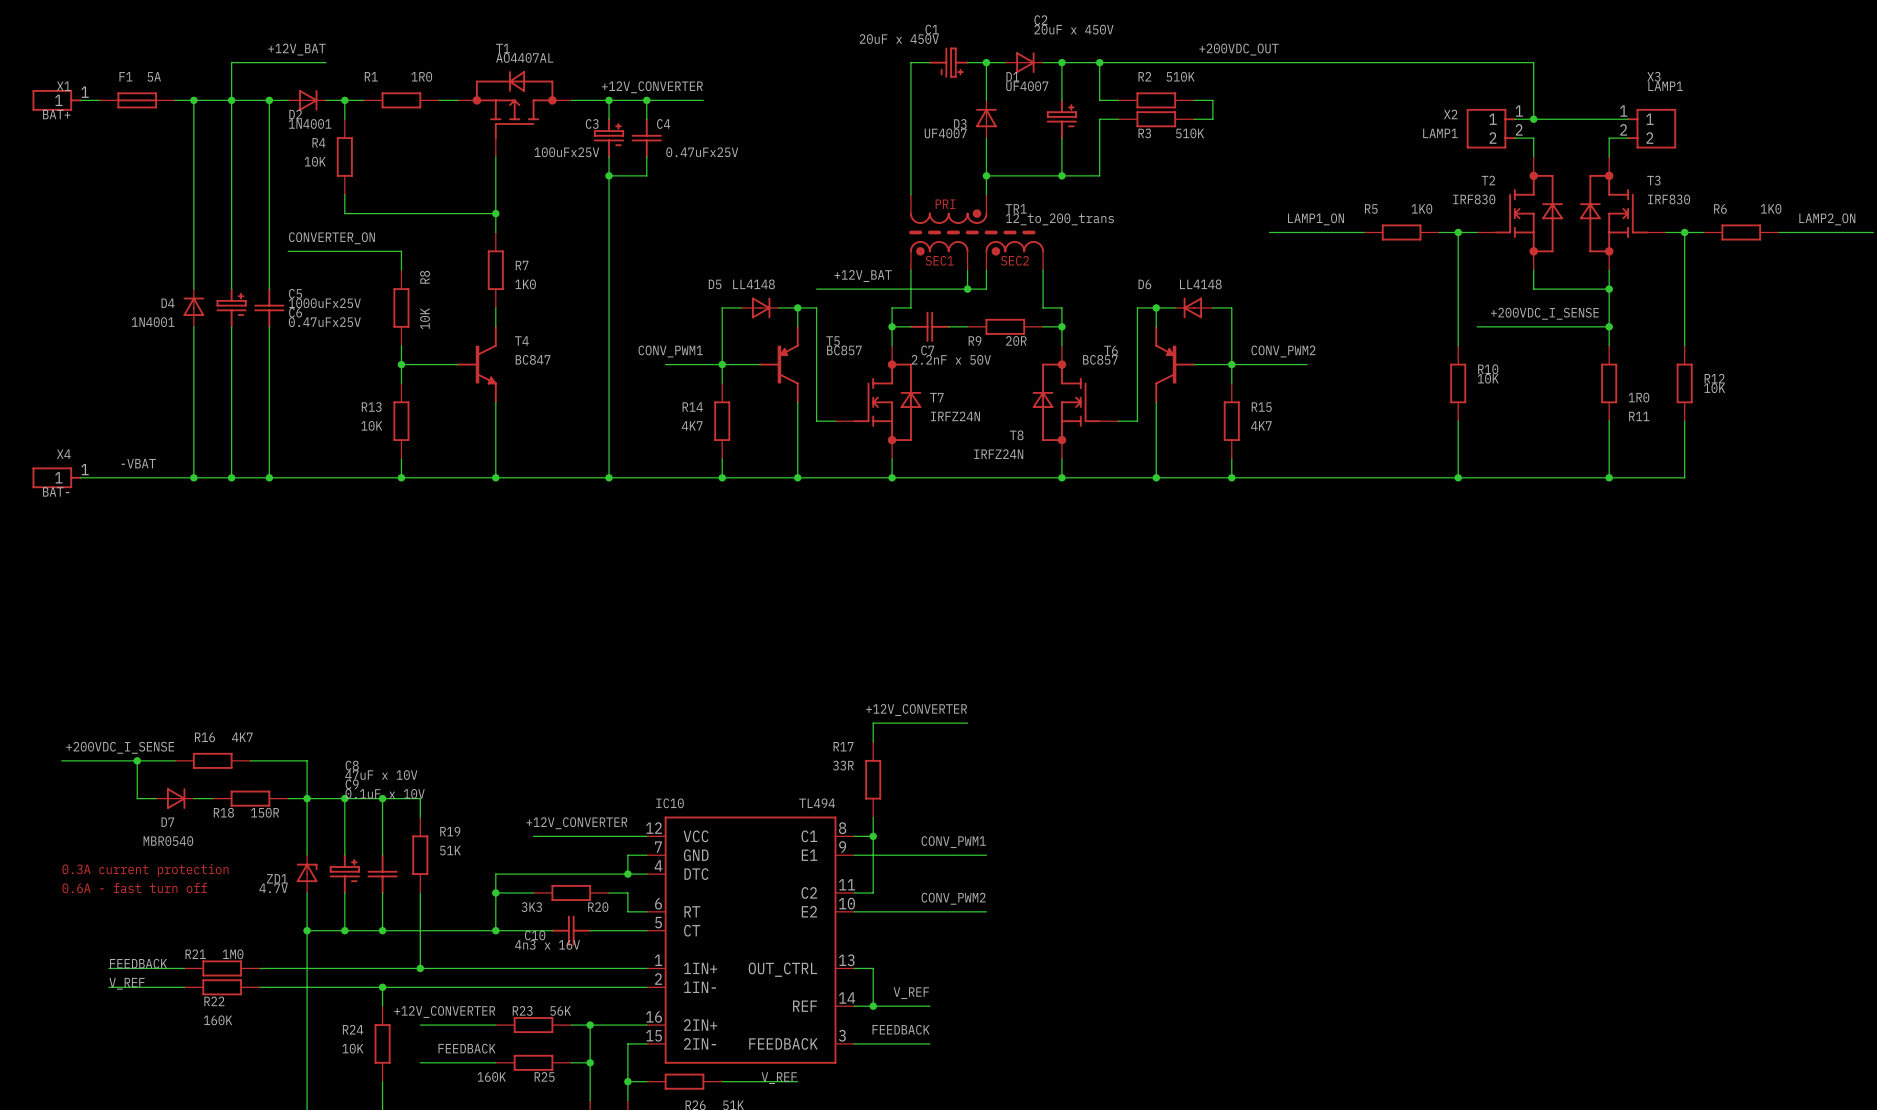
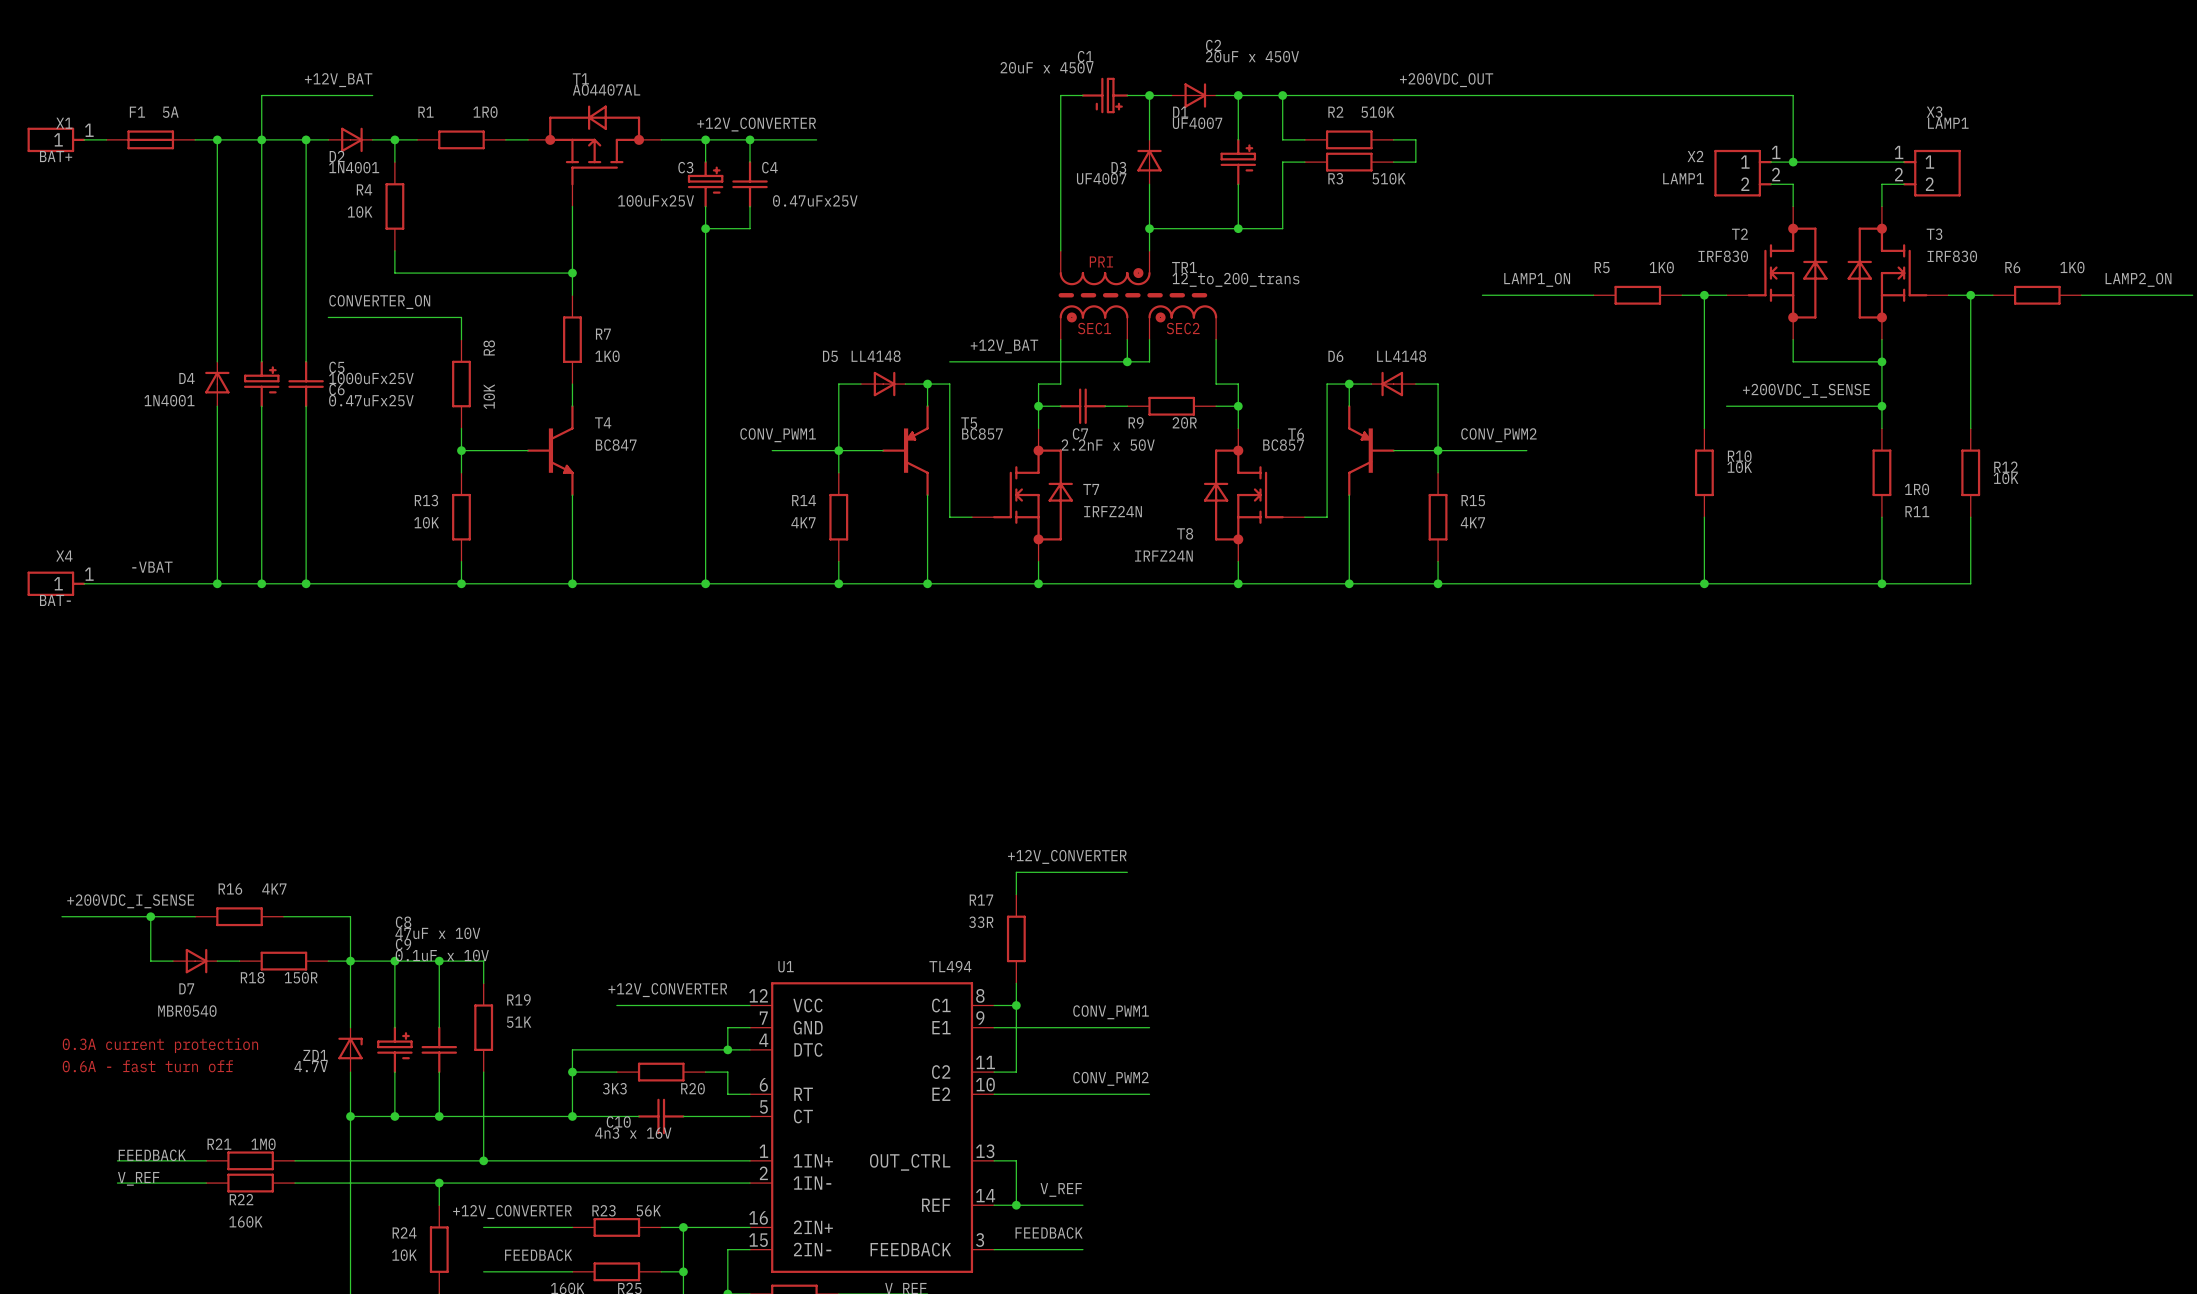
IC10 name: IC10 (670, 803) -> U1 (786, 966)

